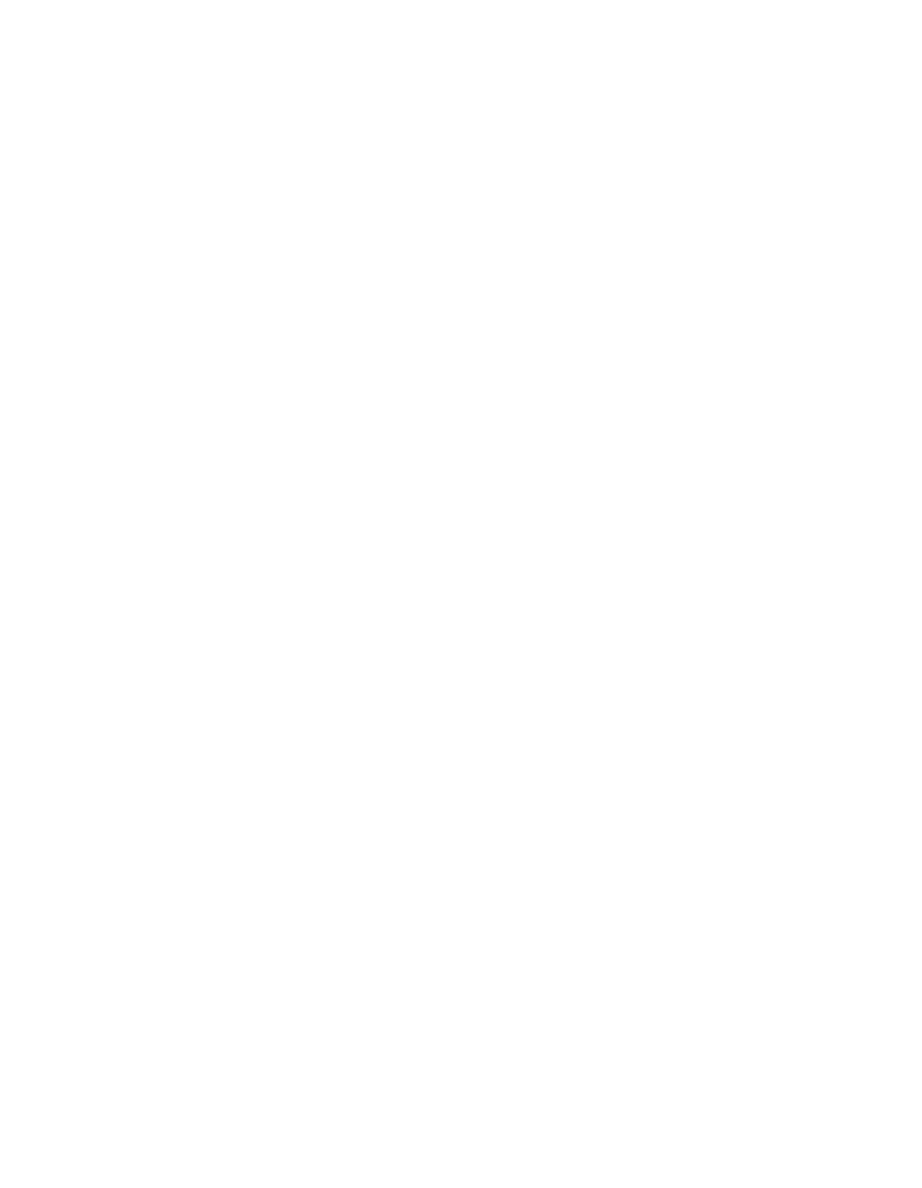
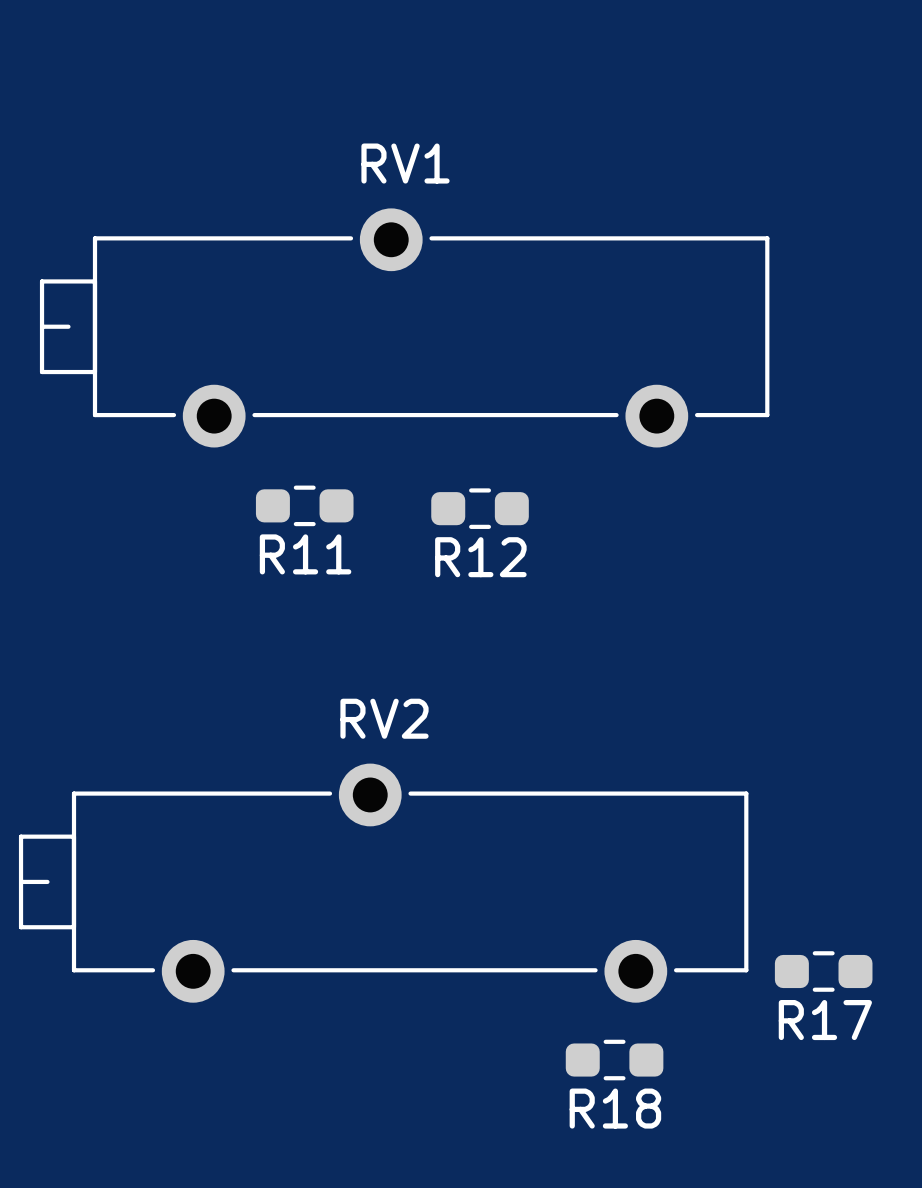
RV1: none -> (404, 327)
R11: none -> (304, 505)
R12: none -> (480, 508)
RV2: none -> (383, 883)
R17: none -> (823, 971)
R18: none -> (614, 1060)

